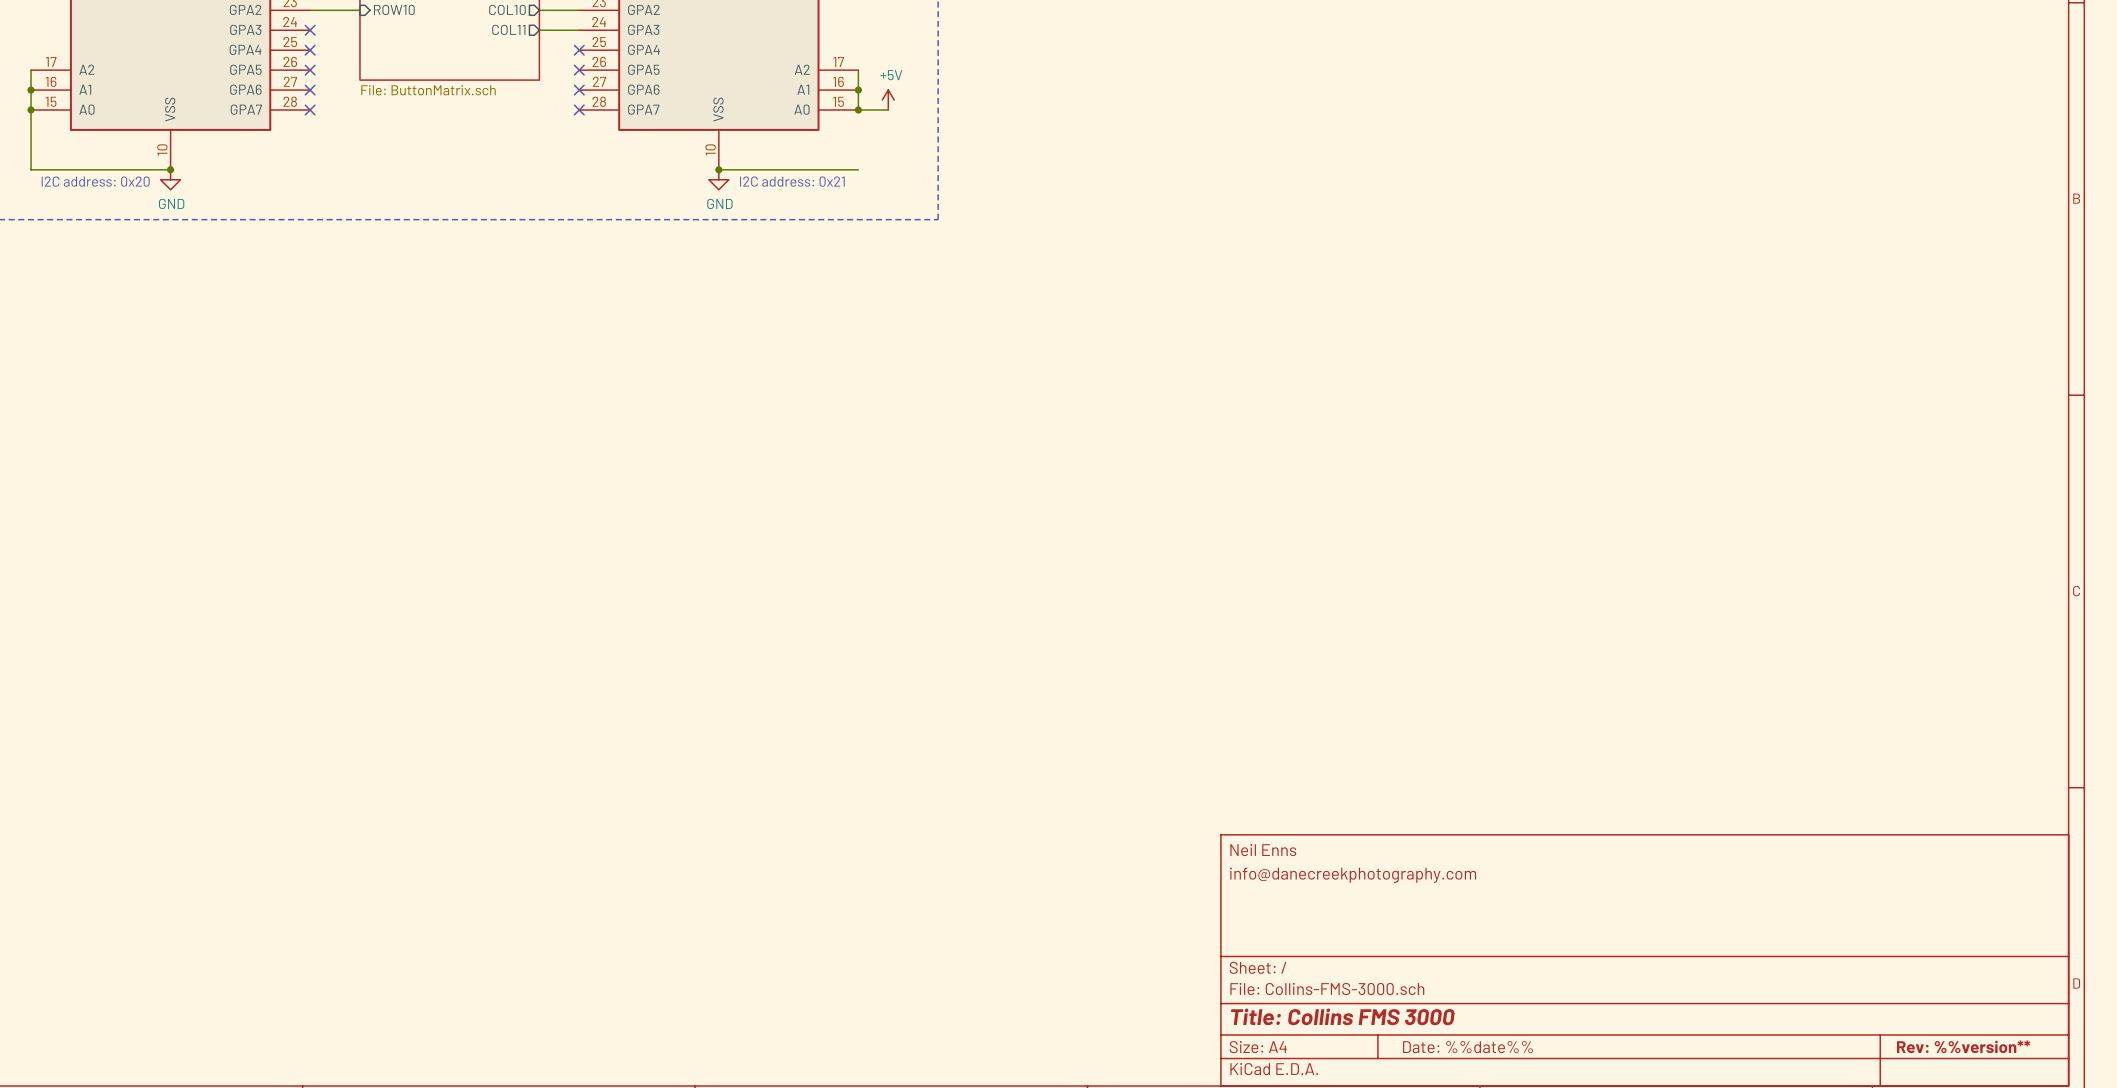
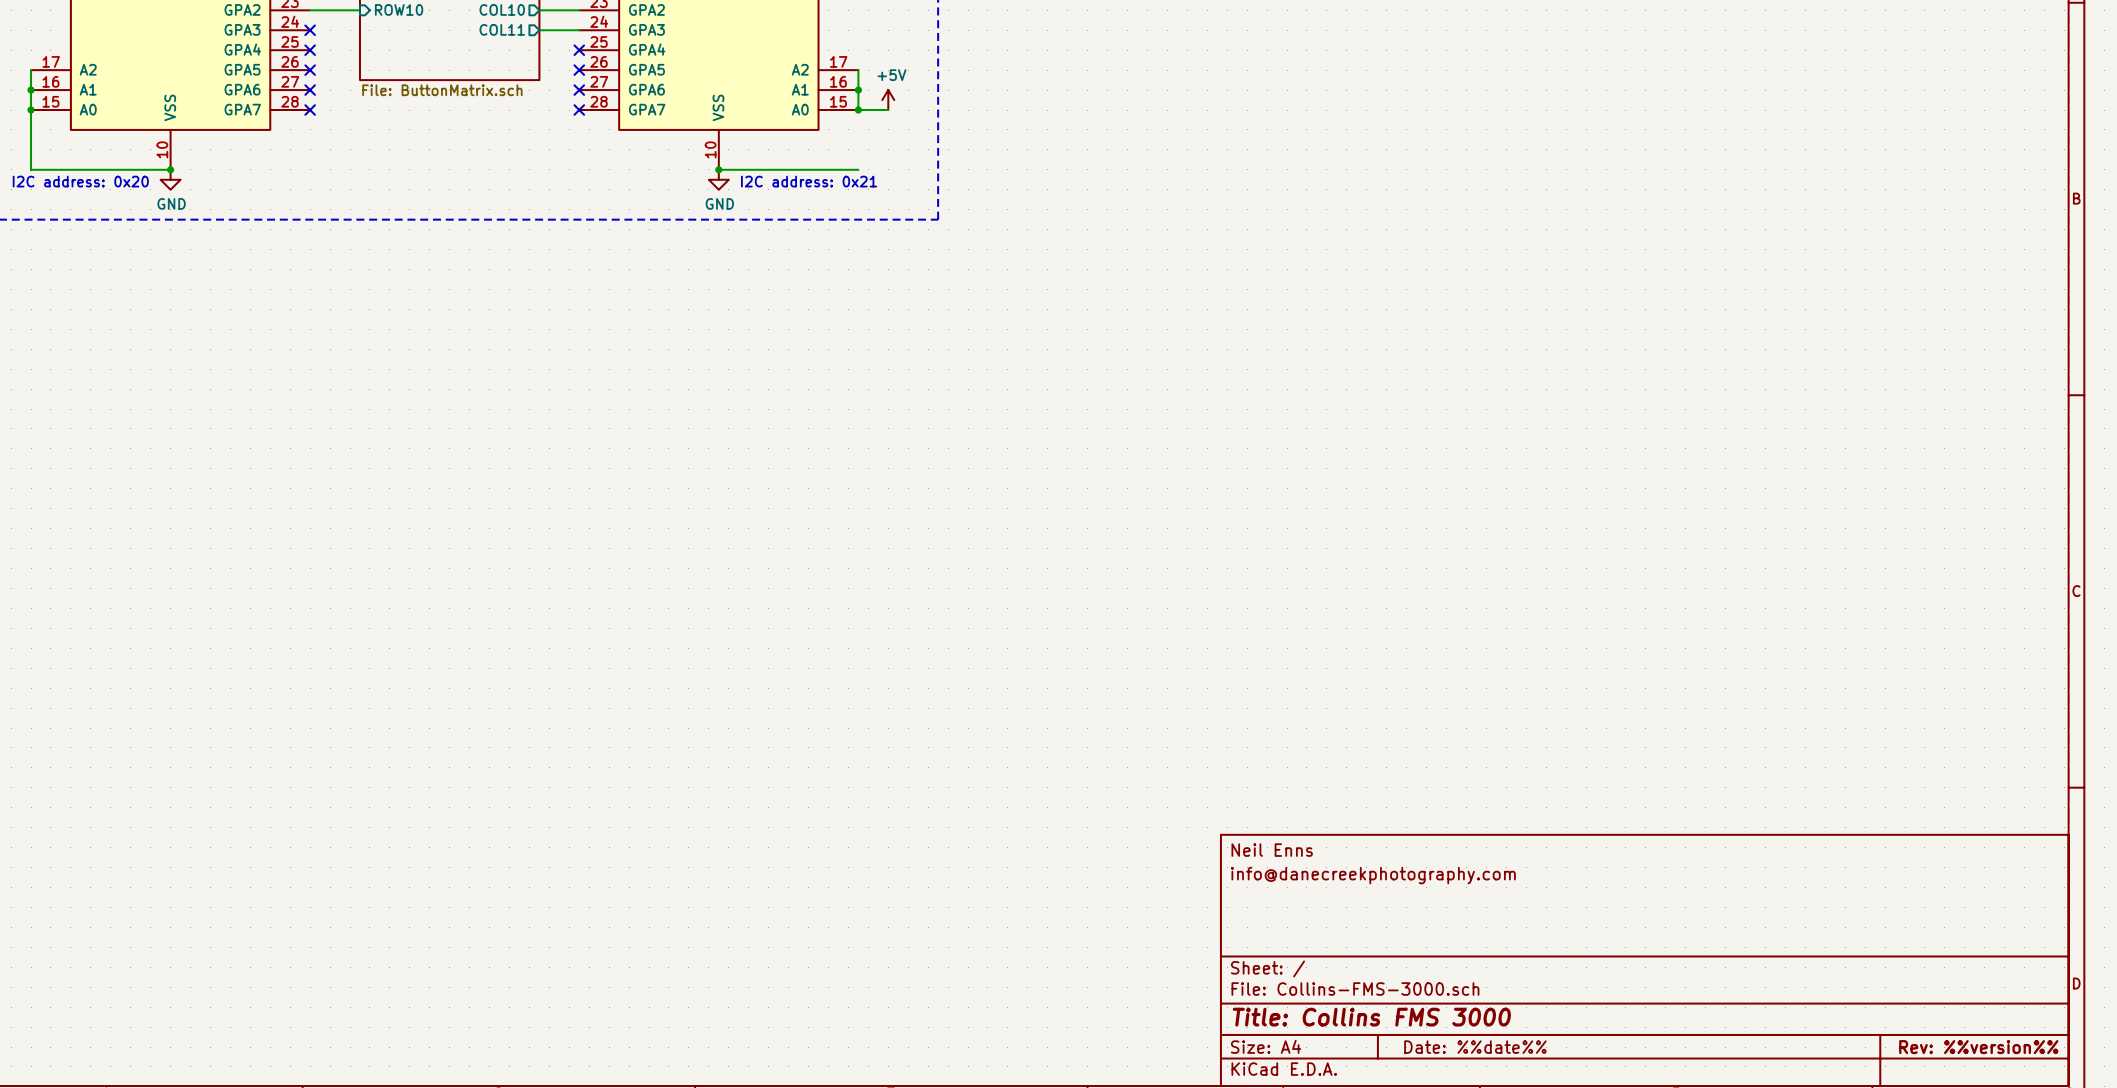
title block: Rev: %%version** (1963, 1046) -> Rev: %%version%% (1978, 1047)

